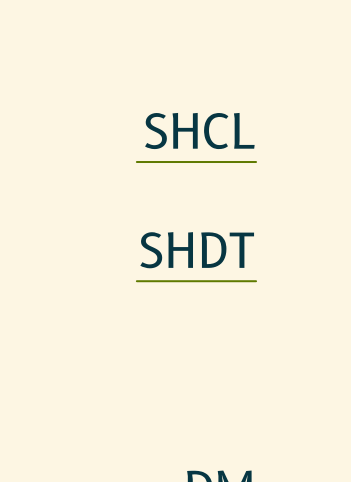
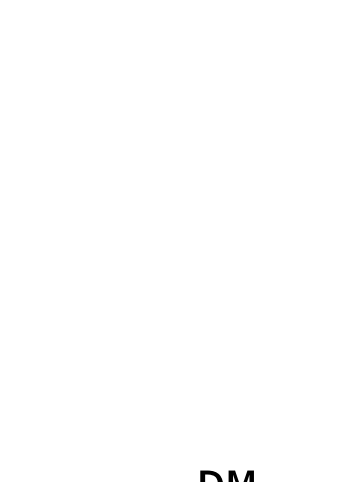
label: SHCL (199, 131) -> none
wire: (136, 162) (256, 162) -> none
label: SHDT (197, 250) -> none
wire: (136, 281) (256, 281) -> none

